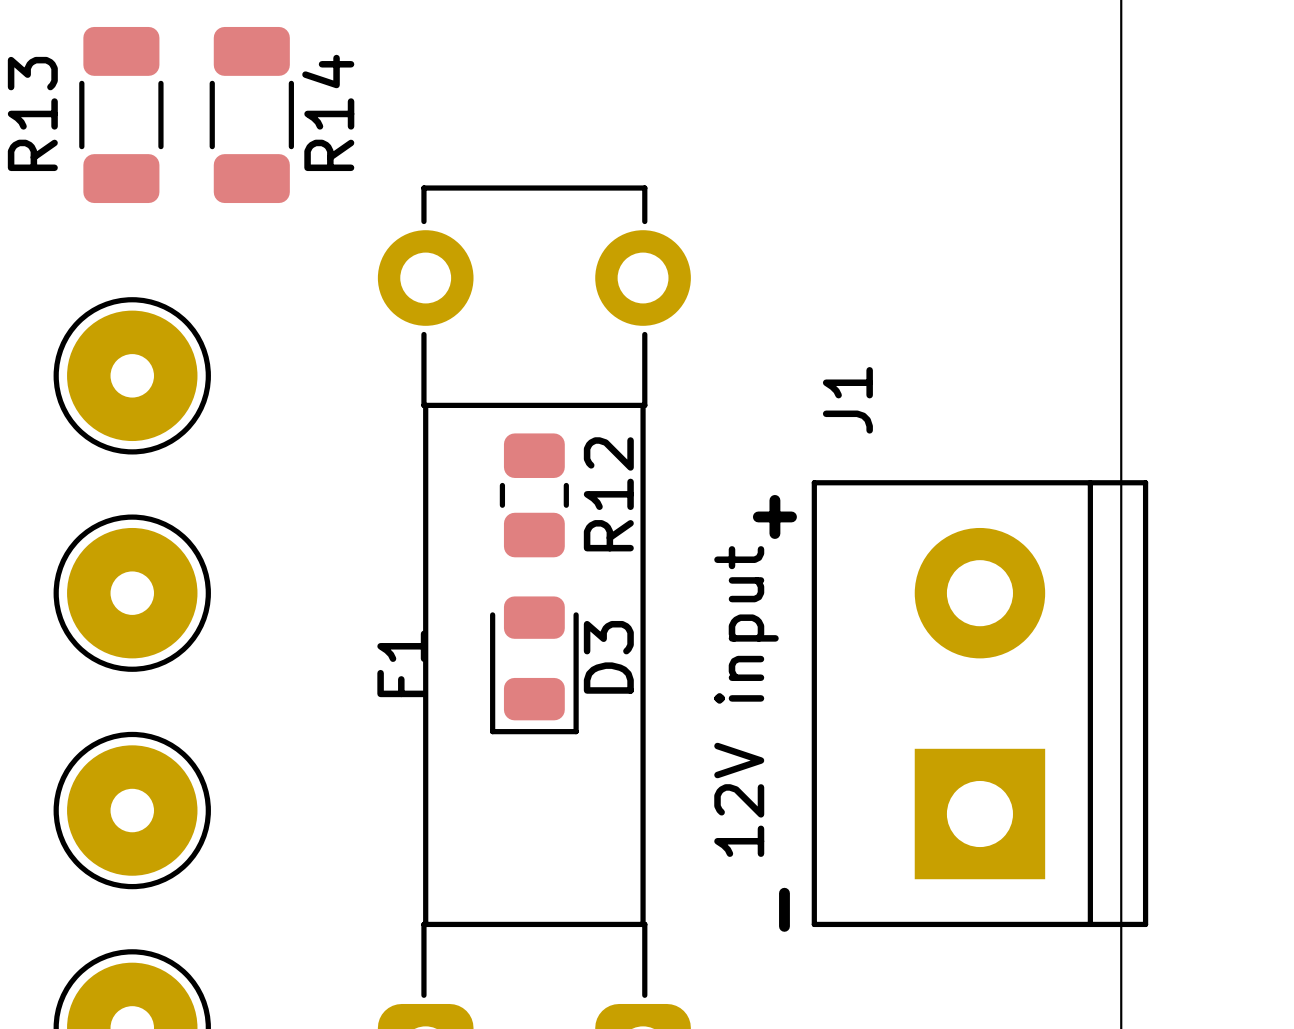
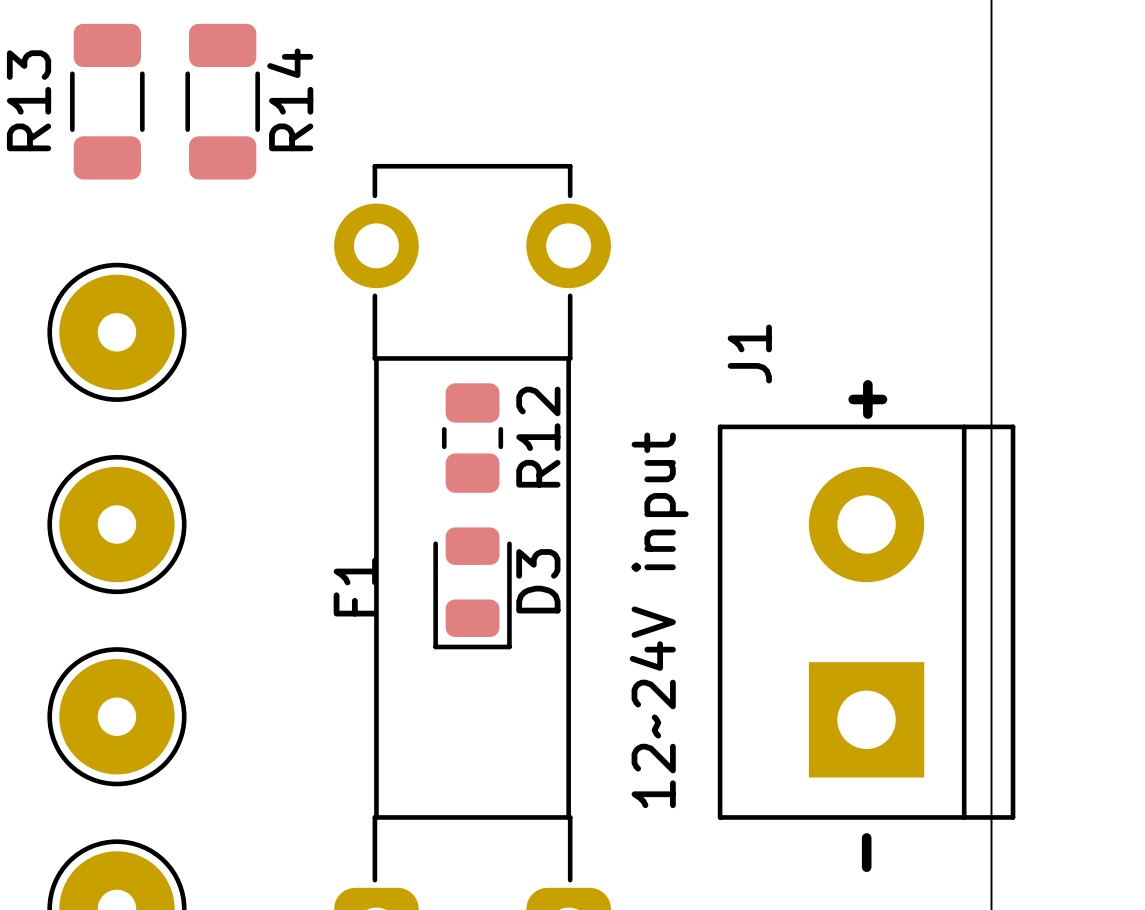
text position: + (774, 516) -> + (867, 399)
J1 value: 12V input (746, 701) -> 12~24V input (659, 620)
text position: - (784, 909) -> - (866, 852)

